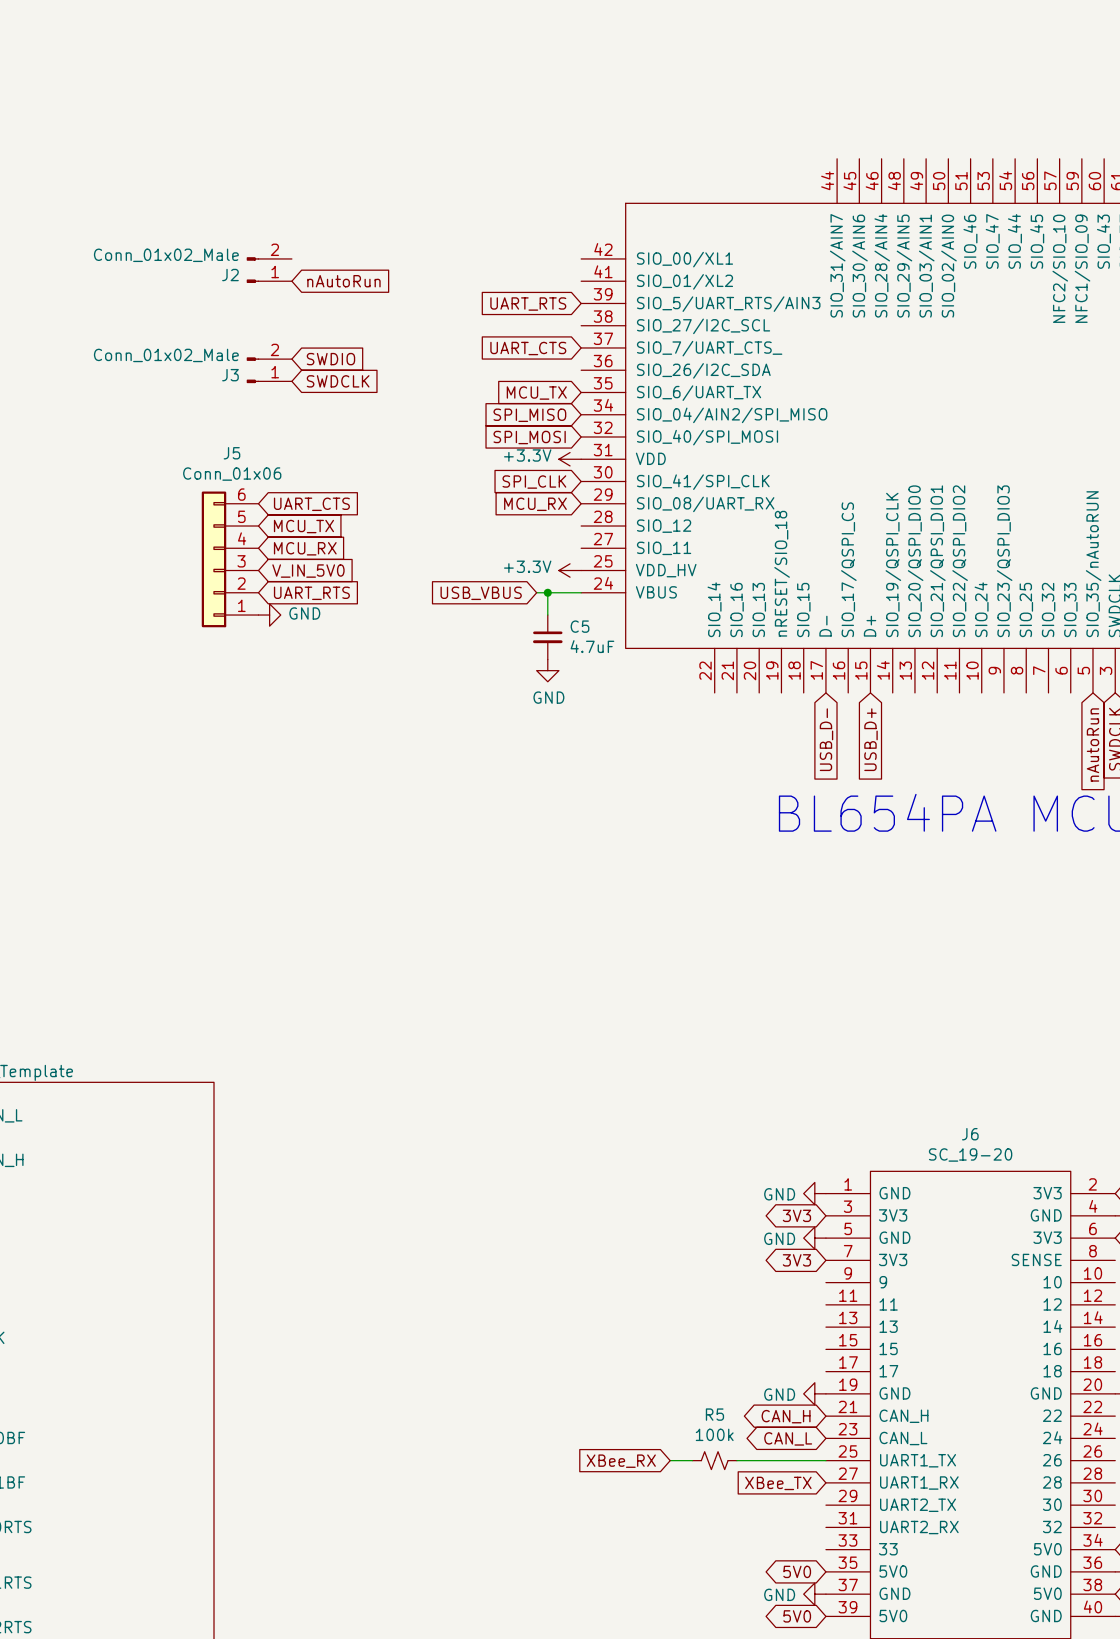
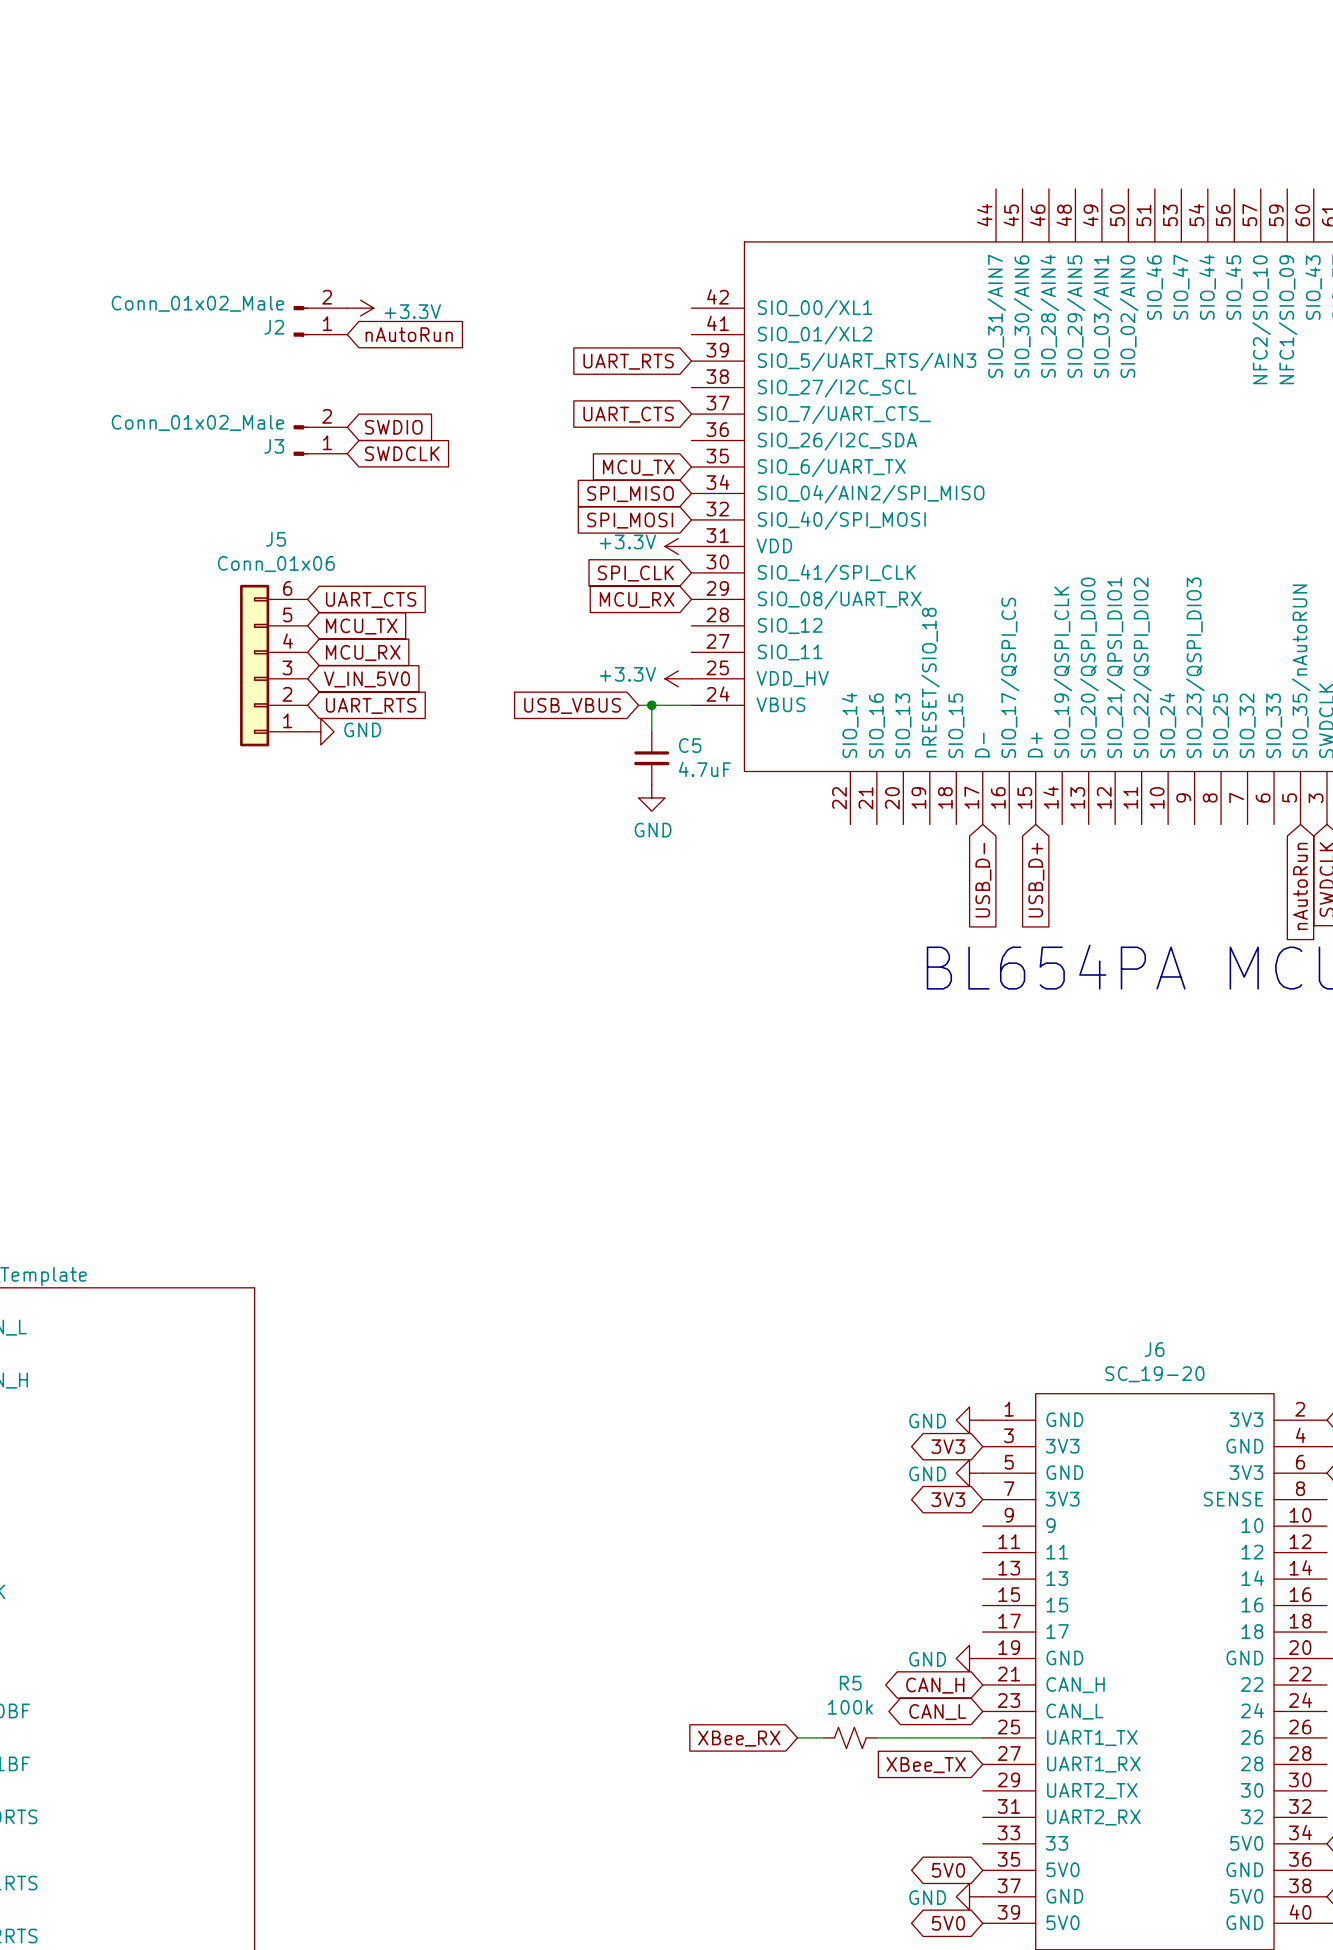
power symbol: none -> +3.3V (360, 308)

